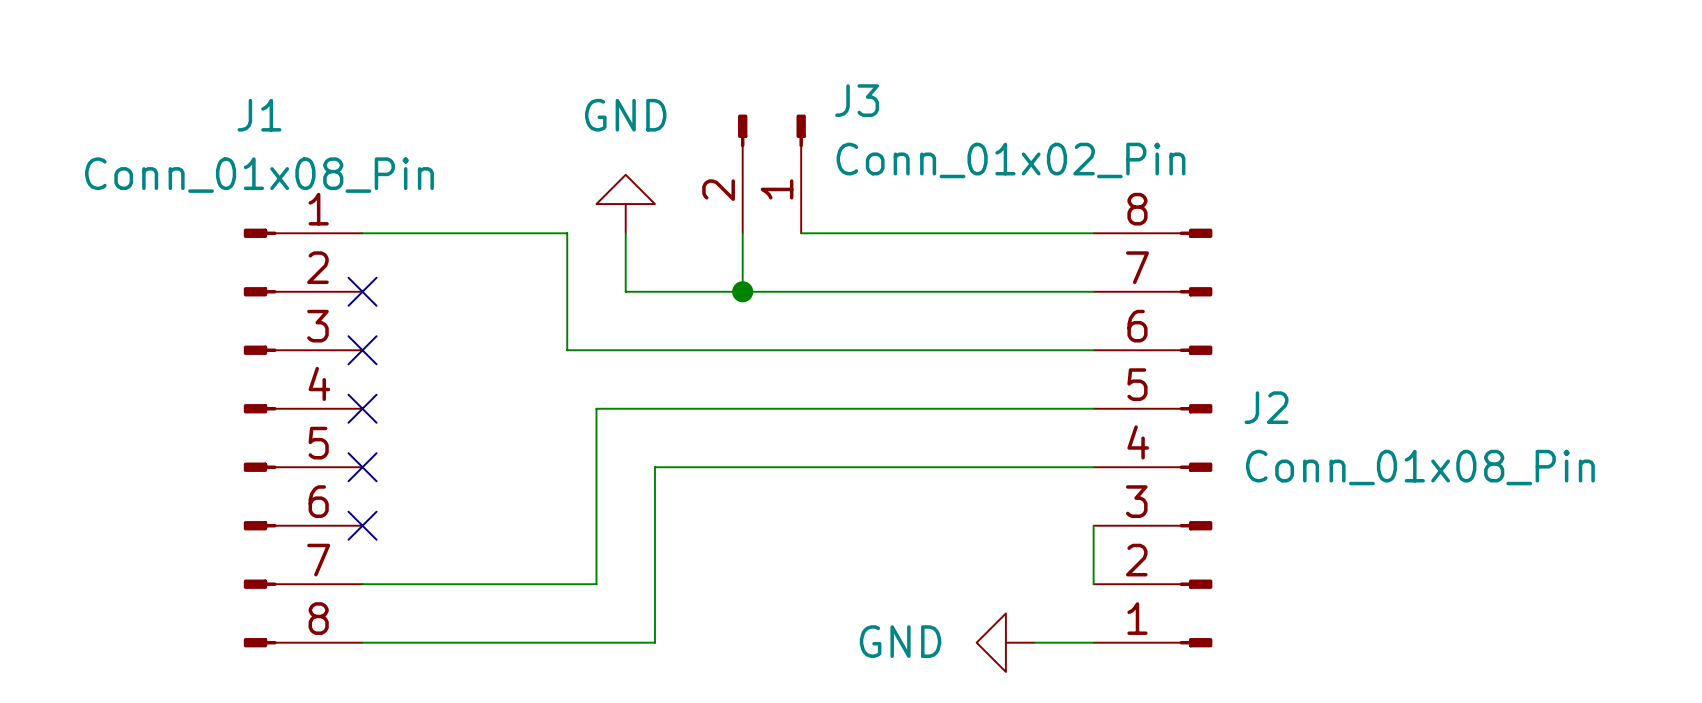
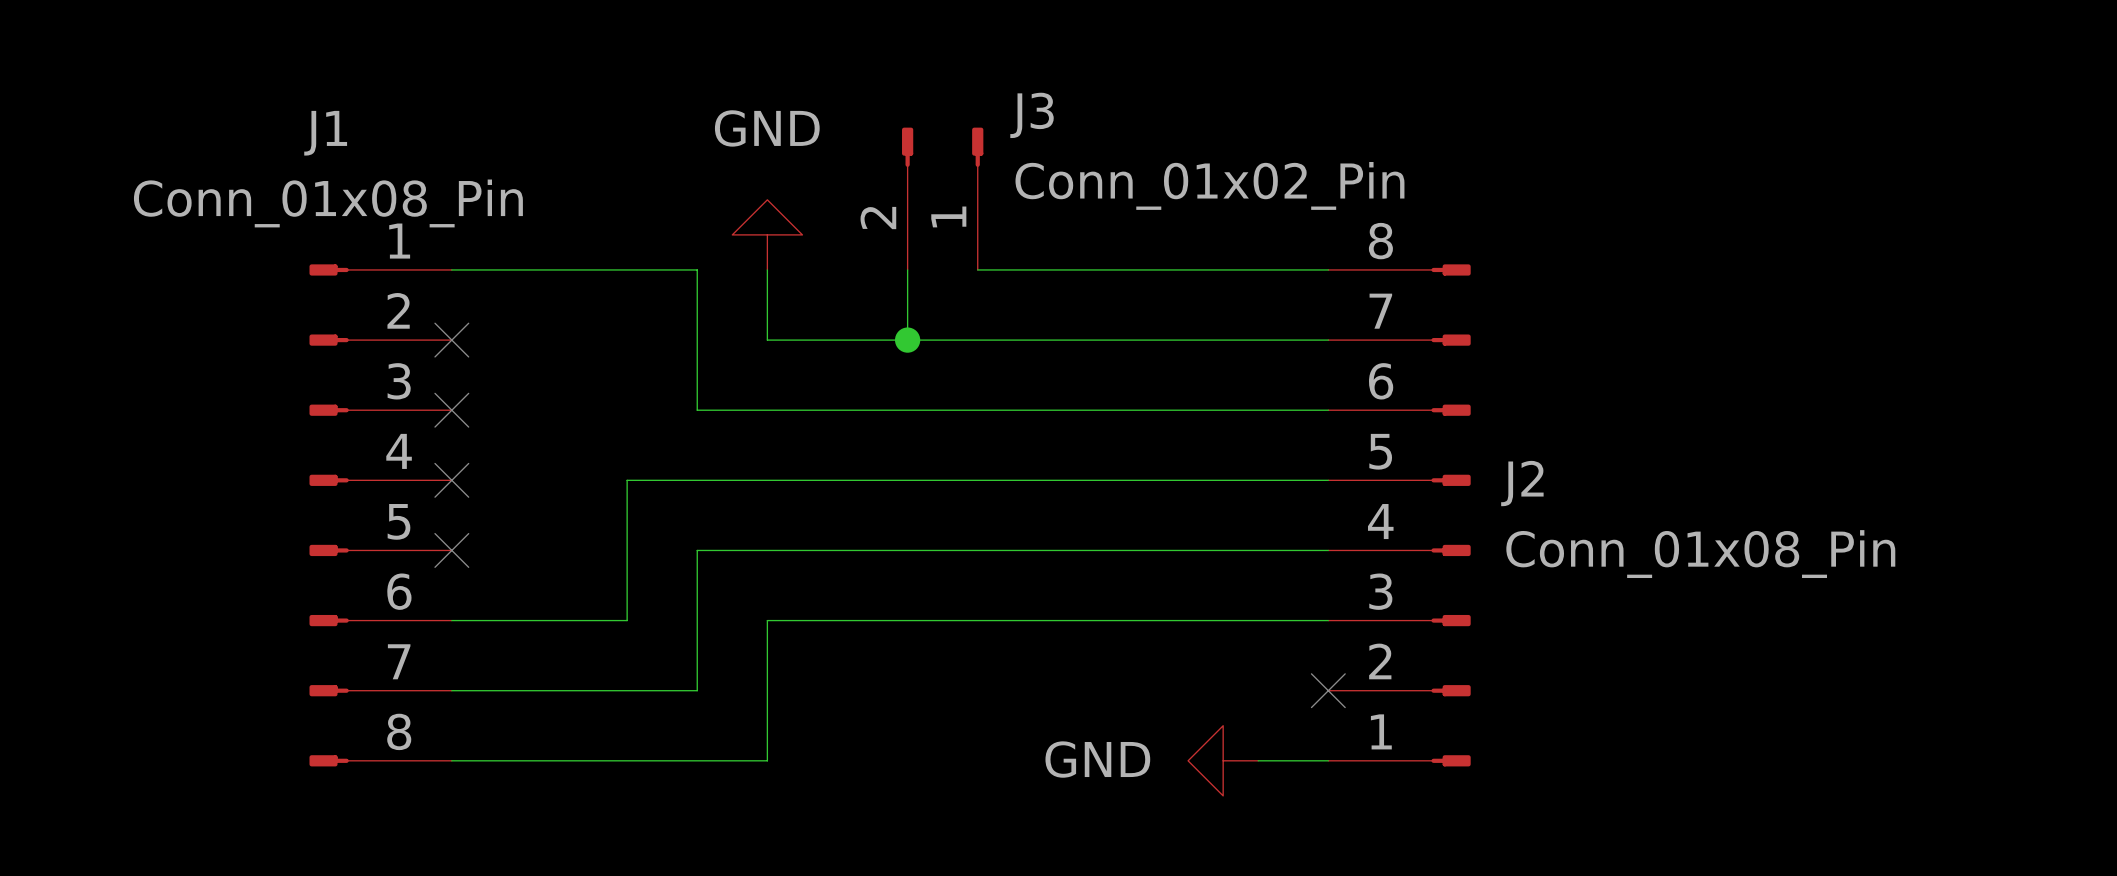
wire: (596, 408) (596, 584) (567, 584) -> (802, 550) (697, 550) (697, 690)
wire: none -> (732, 480) (627, 480) (627, 620) (451, 620)
wire: (654, 467) (654, 642) (625, 642) -> (1328, 620) (767, 620) (767, 760)
no-connect mark: (362, 525) -> none
wire: (1093, 525) (1093, 584) -> none
no-connect mark: none -> (1328, 690)

